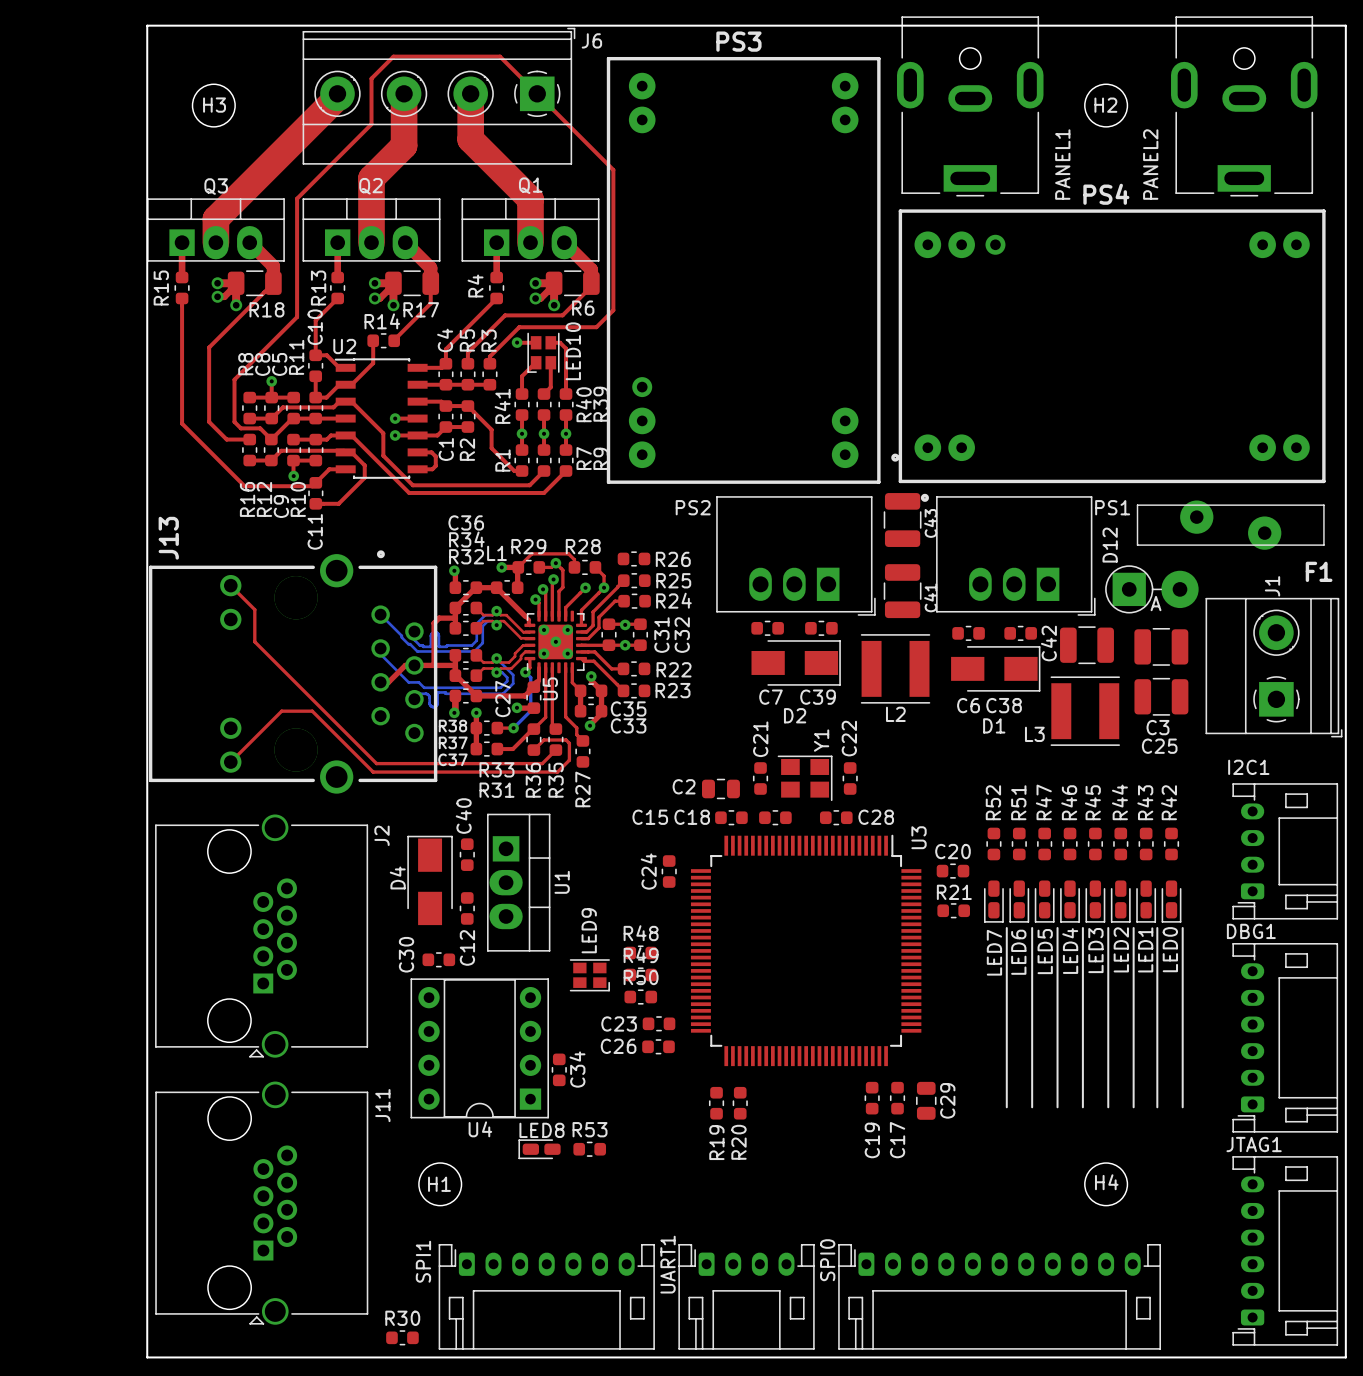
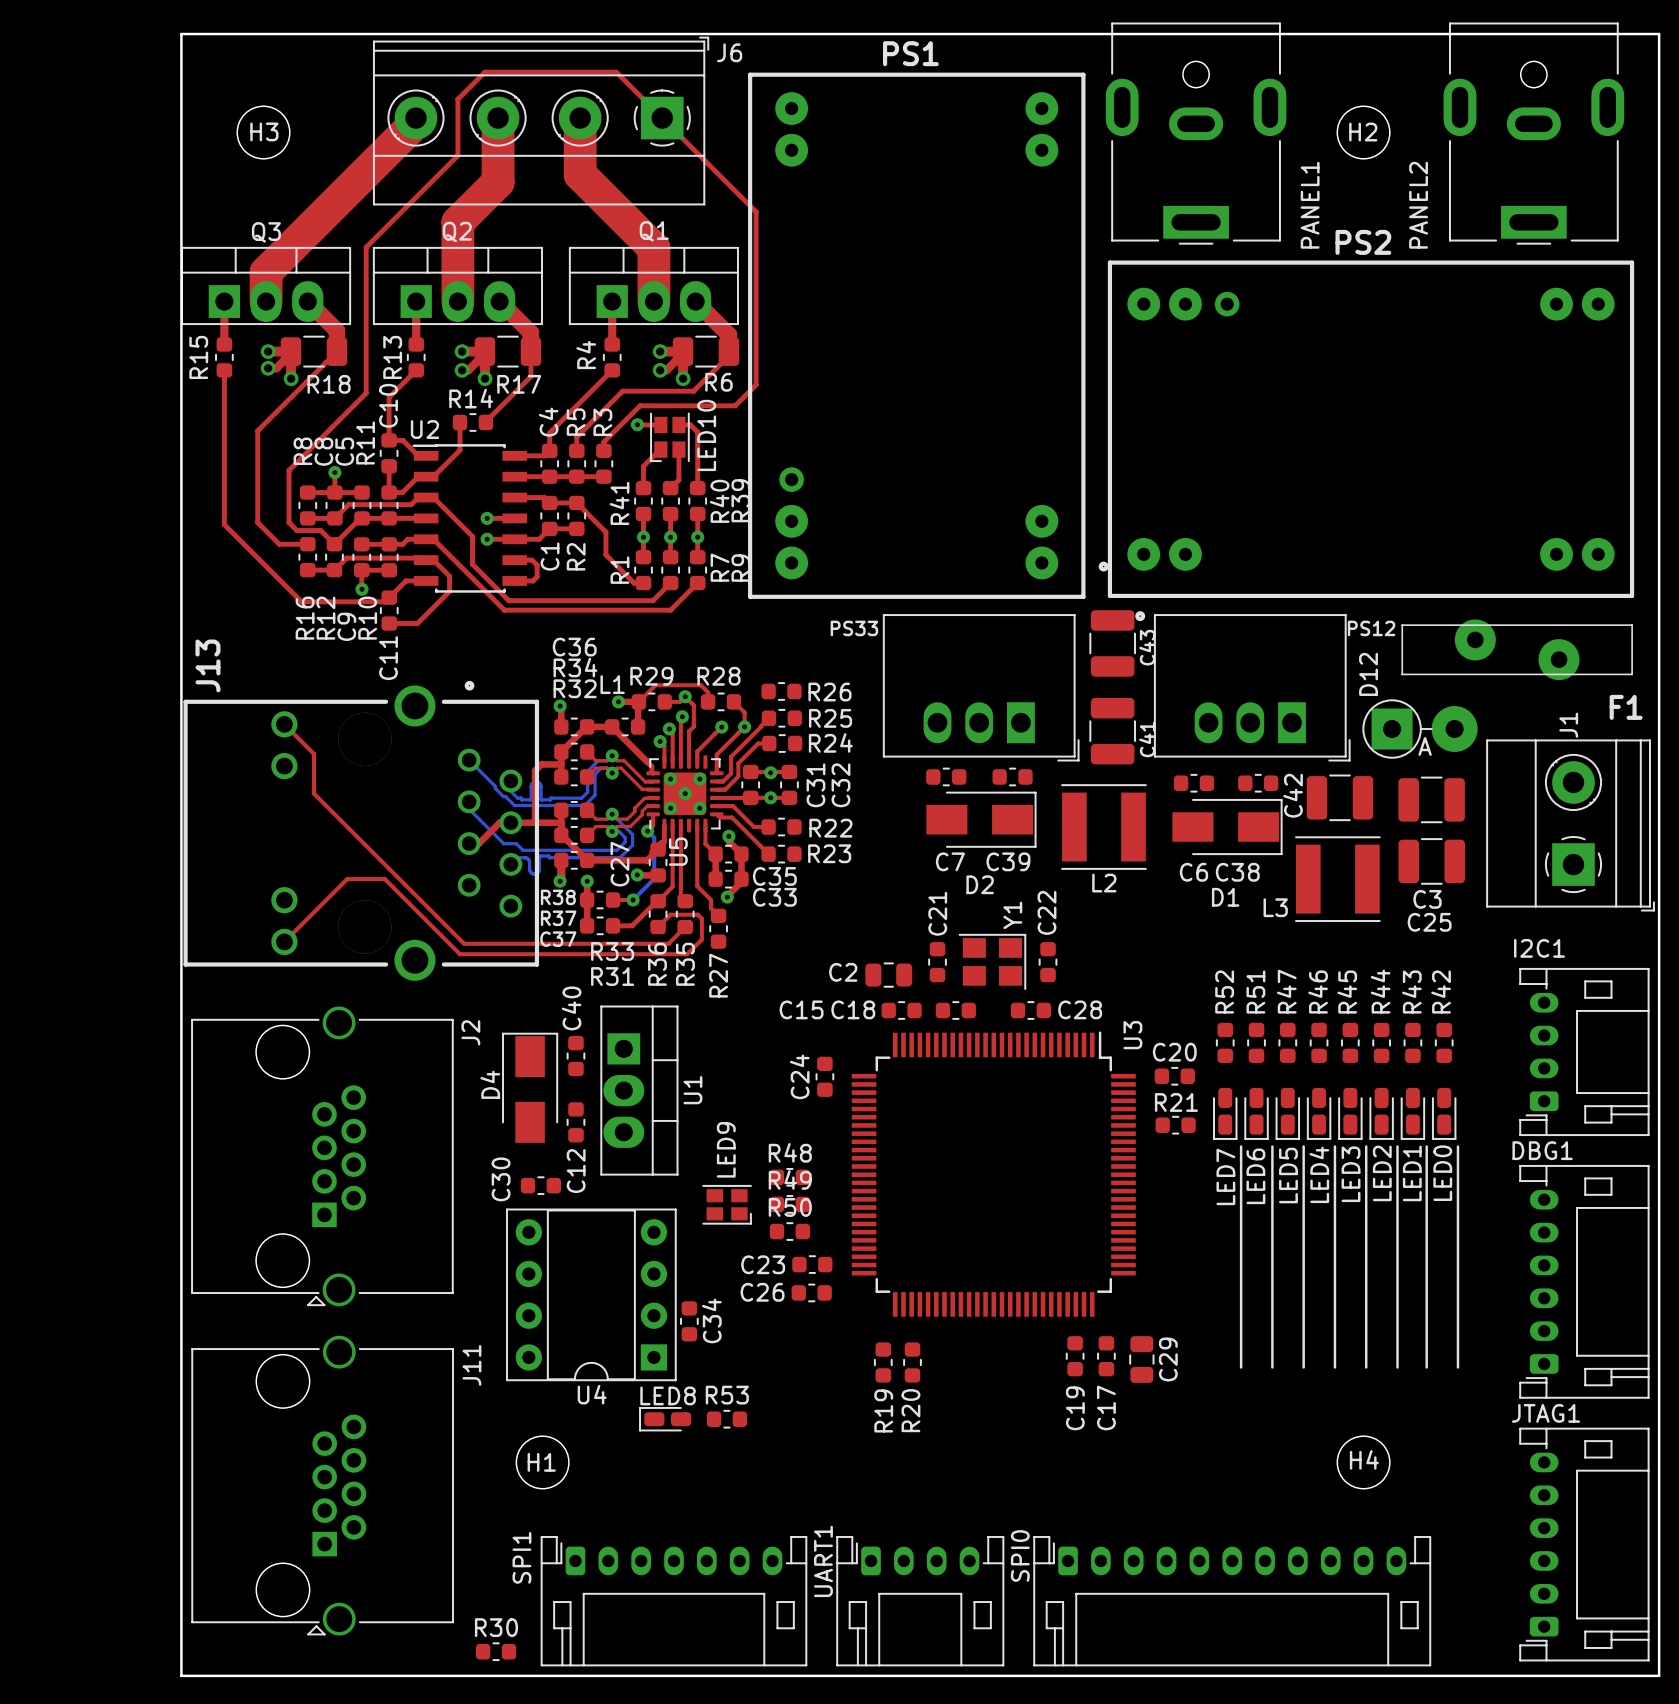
PS3 name: PS3 (738, 41) -> PS1 (910, 53)
PS4 name: PS4 (1106, 194) -> PS2 (1363, 242)
PS2 name: PS2 (693, 507) -> PS33 (854, 628)
PS1 name: PS1 (1112, 507) -> PS12 (1371, 628)

